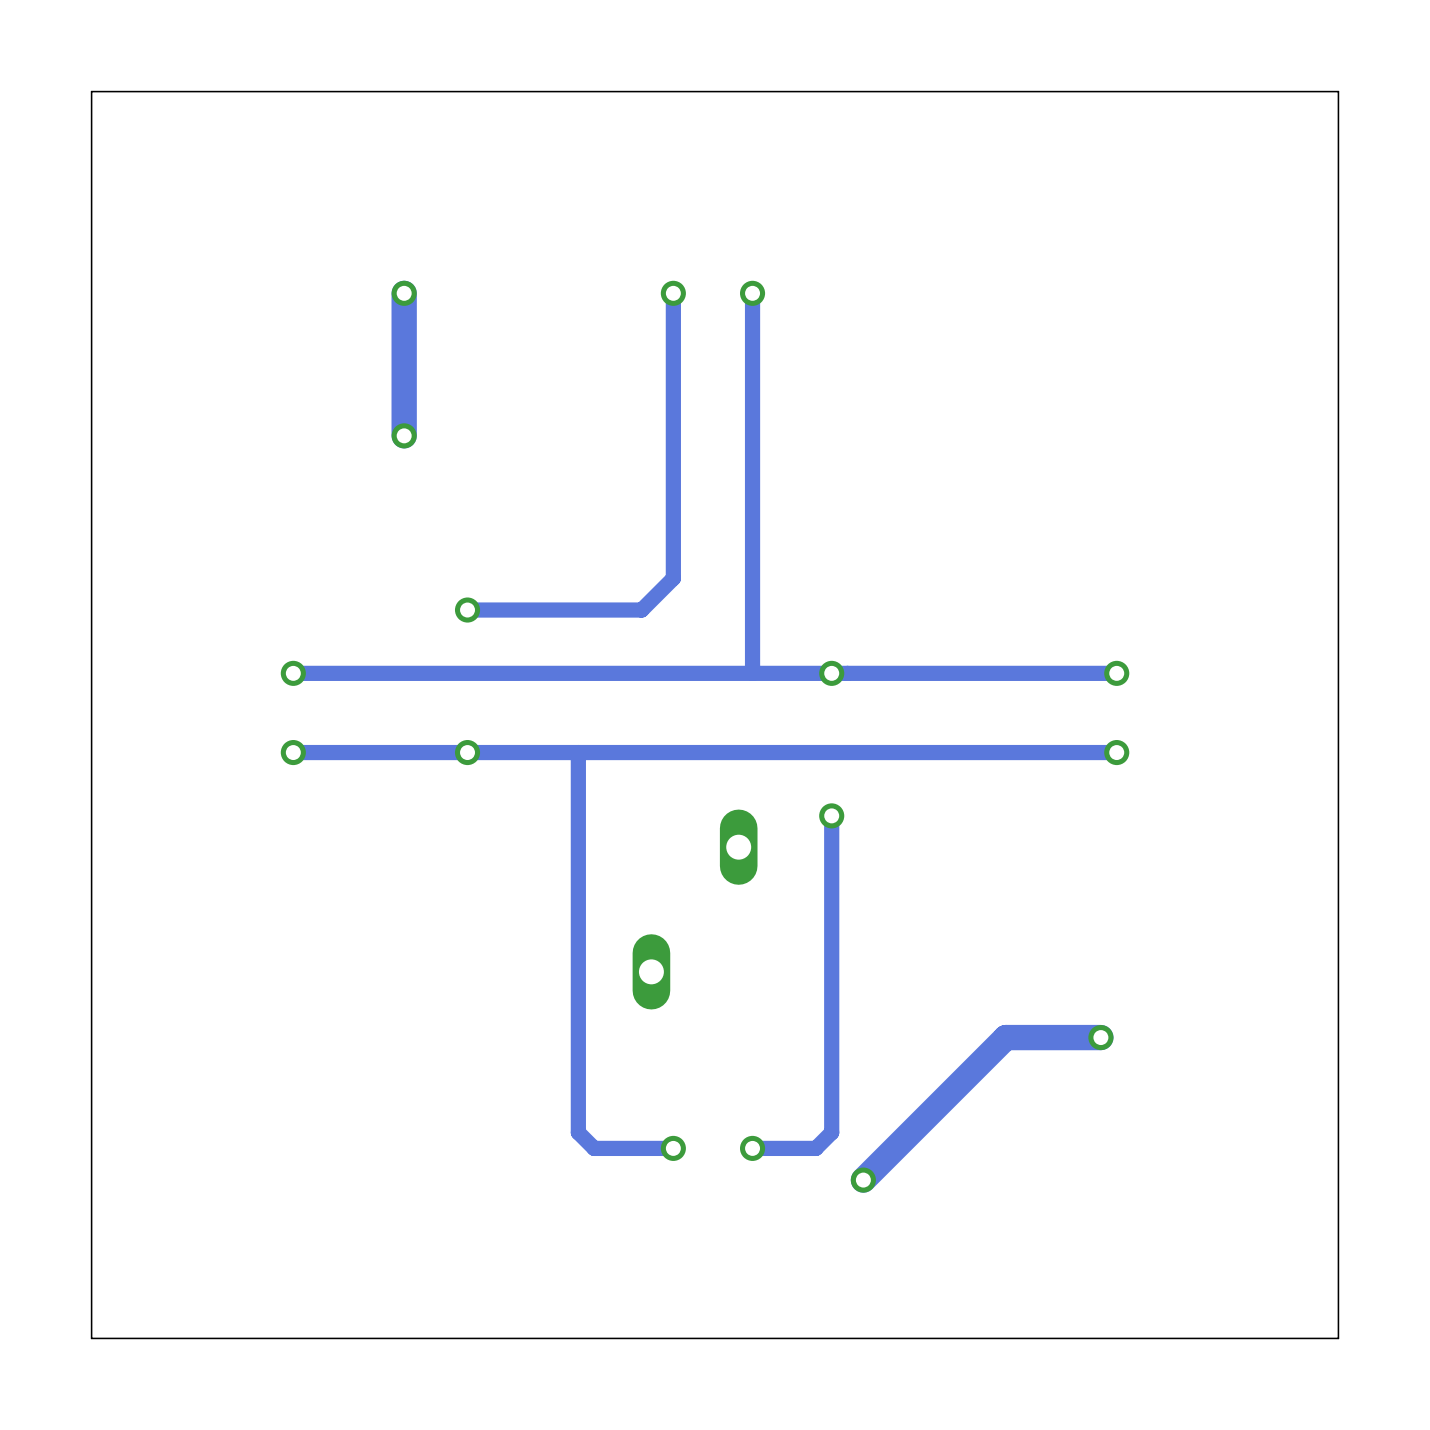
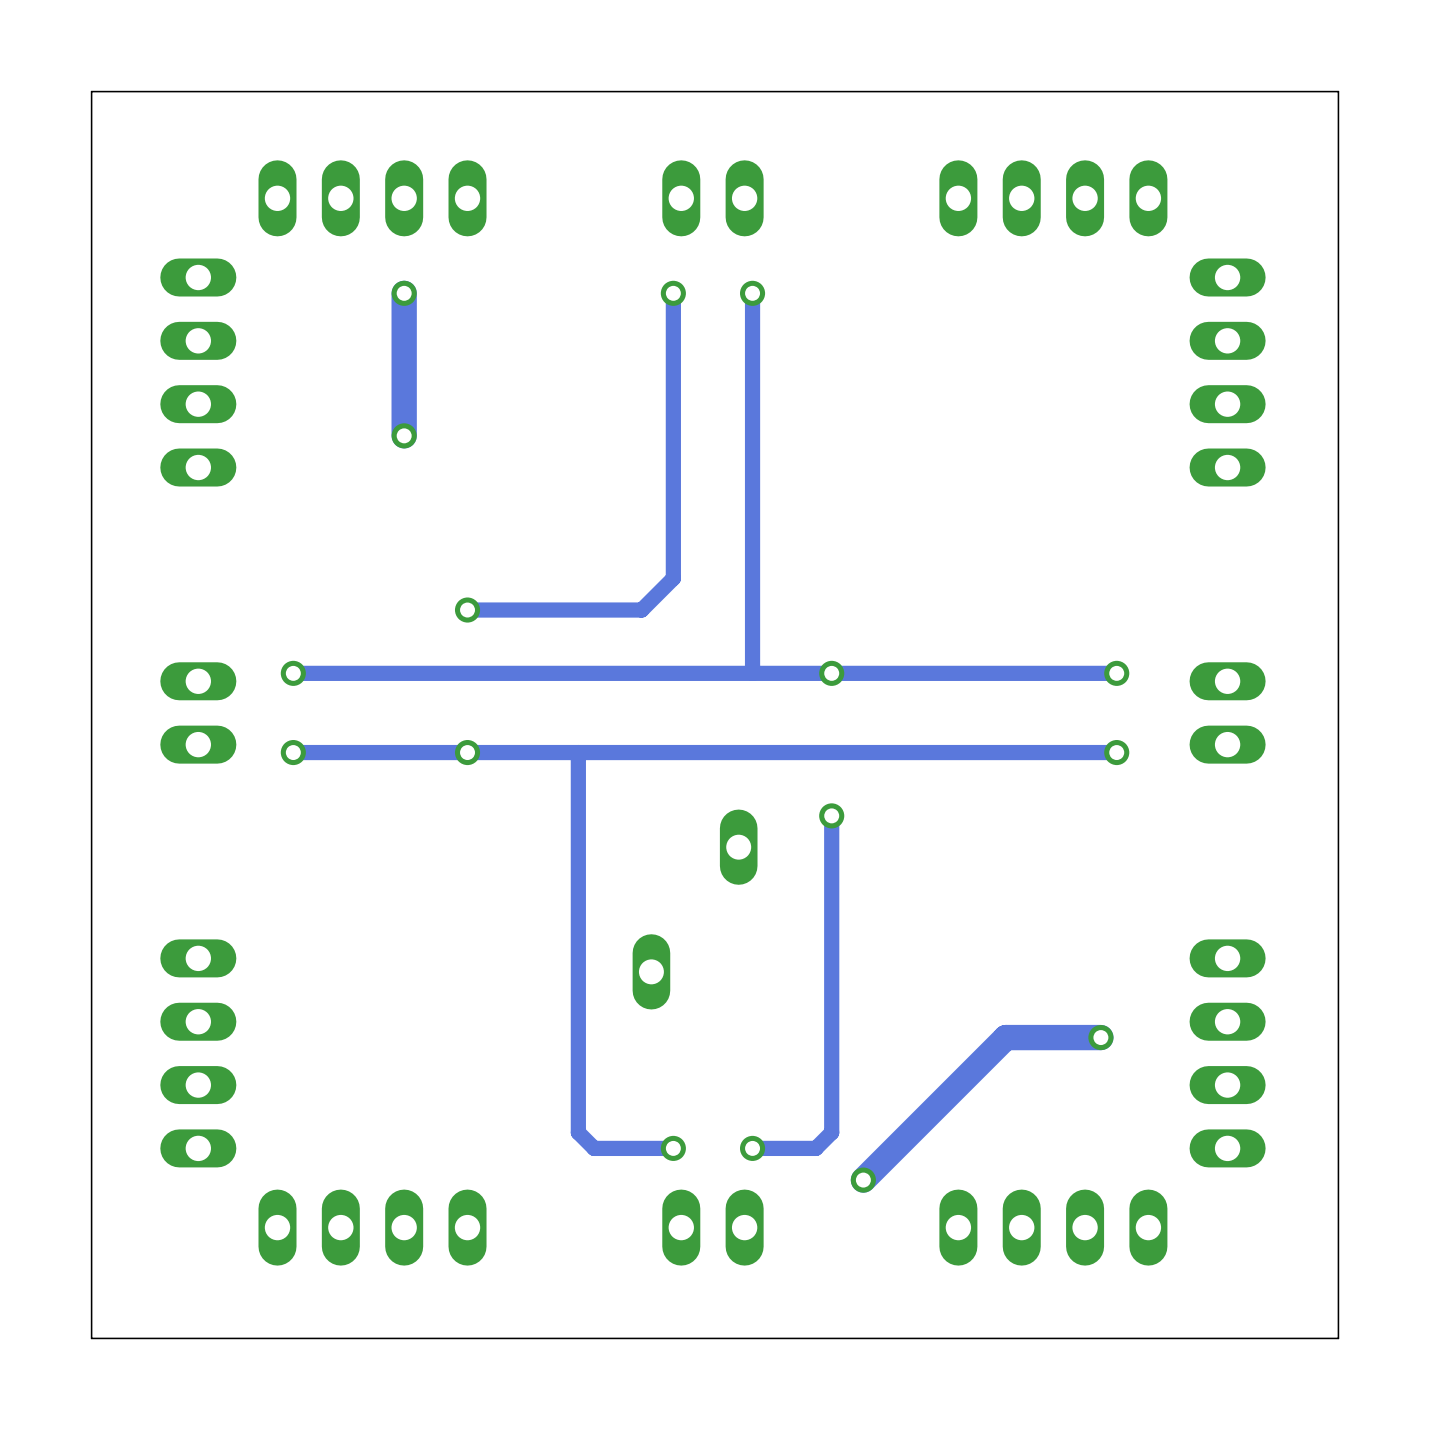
part: none -> (372, 198)
part: none -> (712, 198)
part: none -> (1053, 198)
part: none -> (198, 372)
part: none -> (1227, 372)
part: none -> (198, 712)
part: none -> (1227, 712)
part: none -> (198, 1053)
part: none -> (1227, 1053)
part: none -> (372, 1227)
part: none -> (712, 1227)
part: none -> (1053, 1227)

